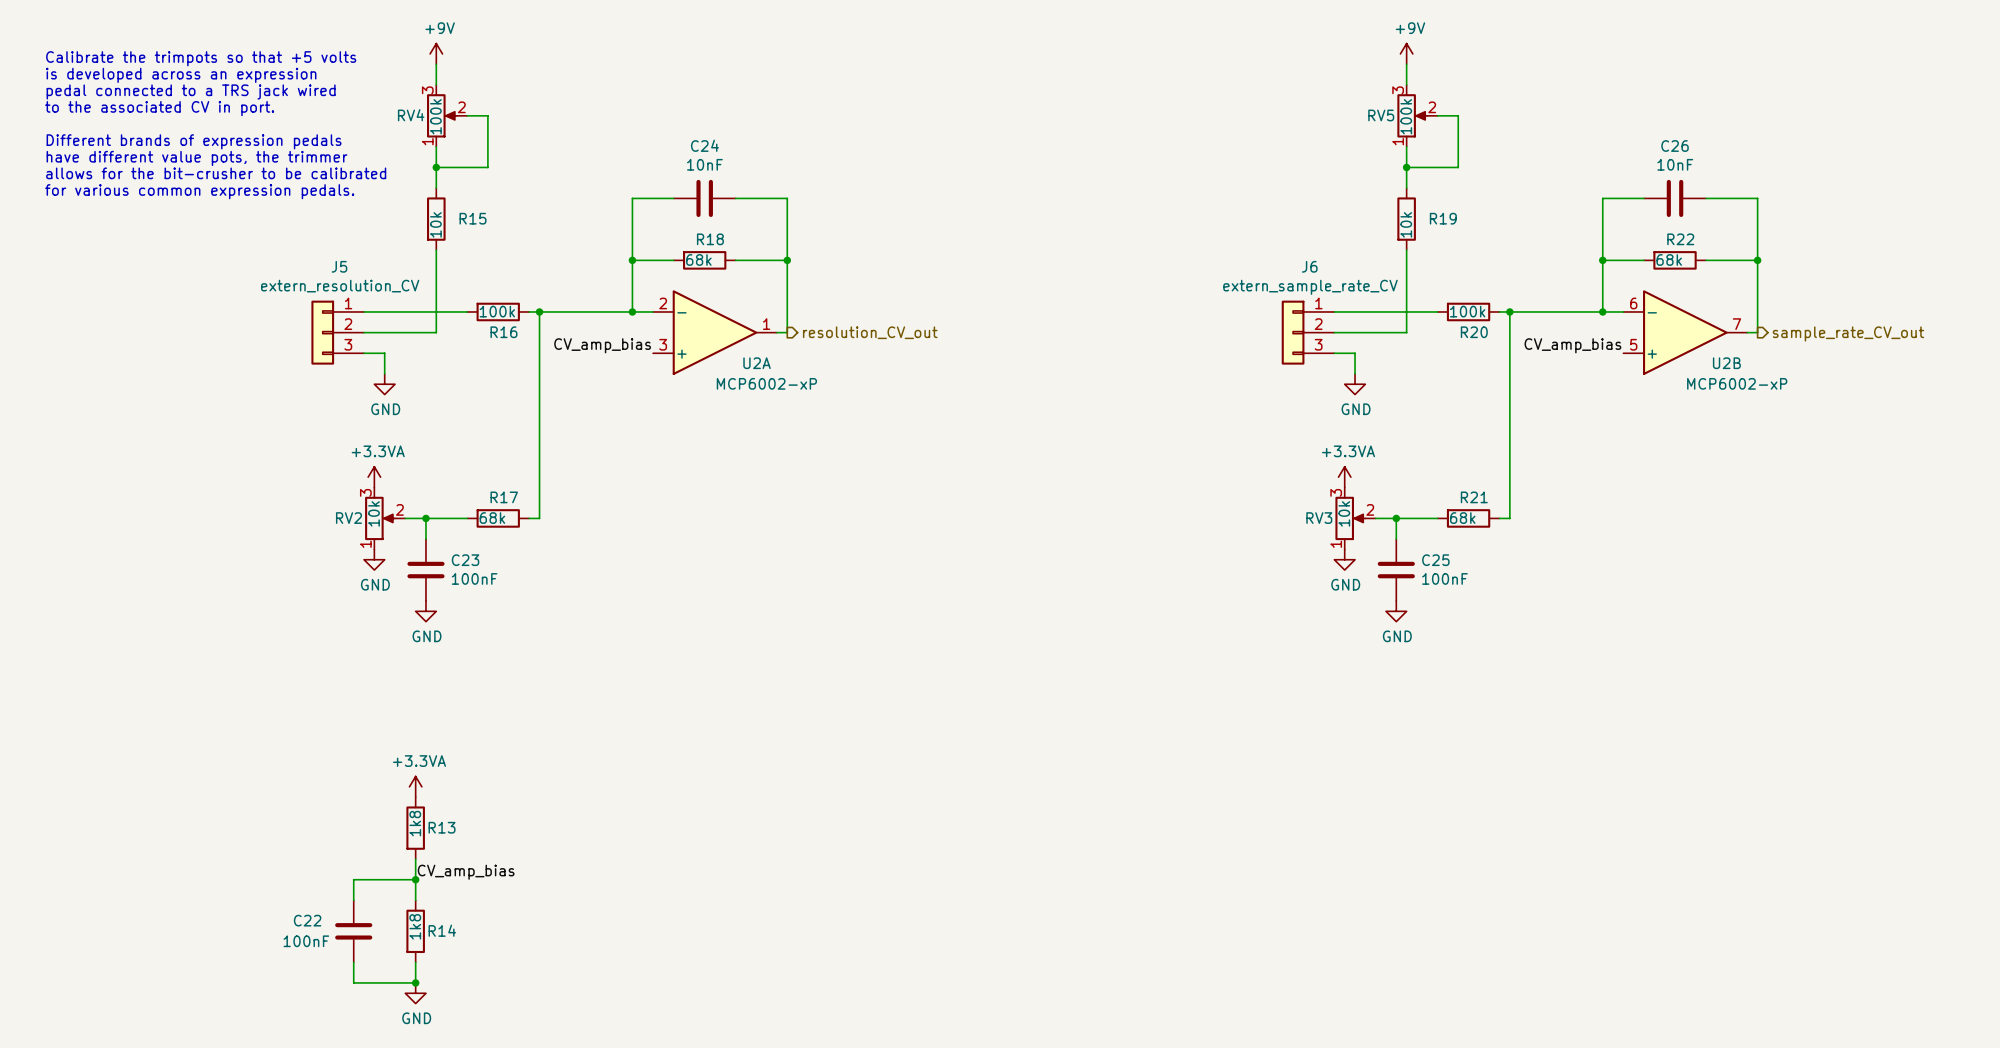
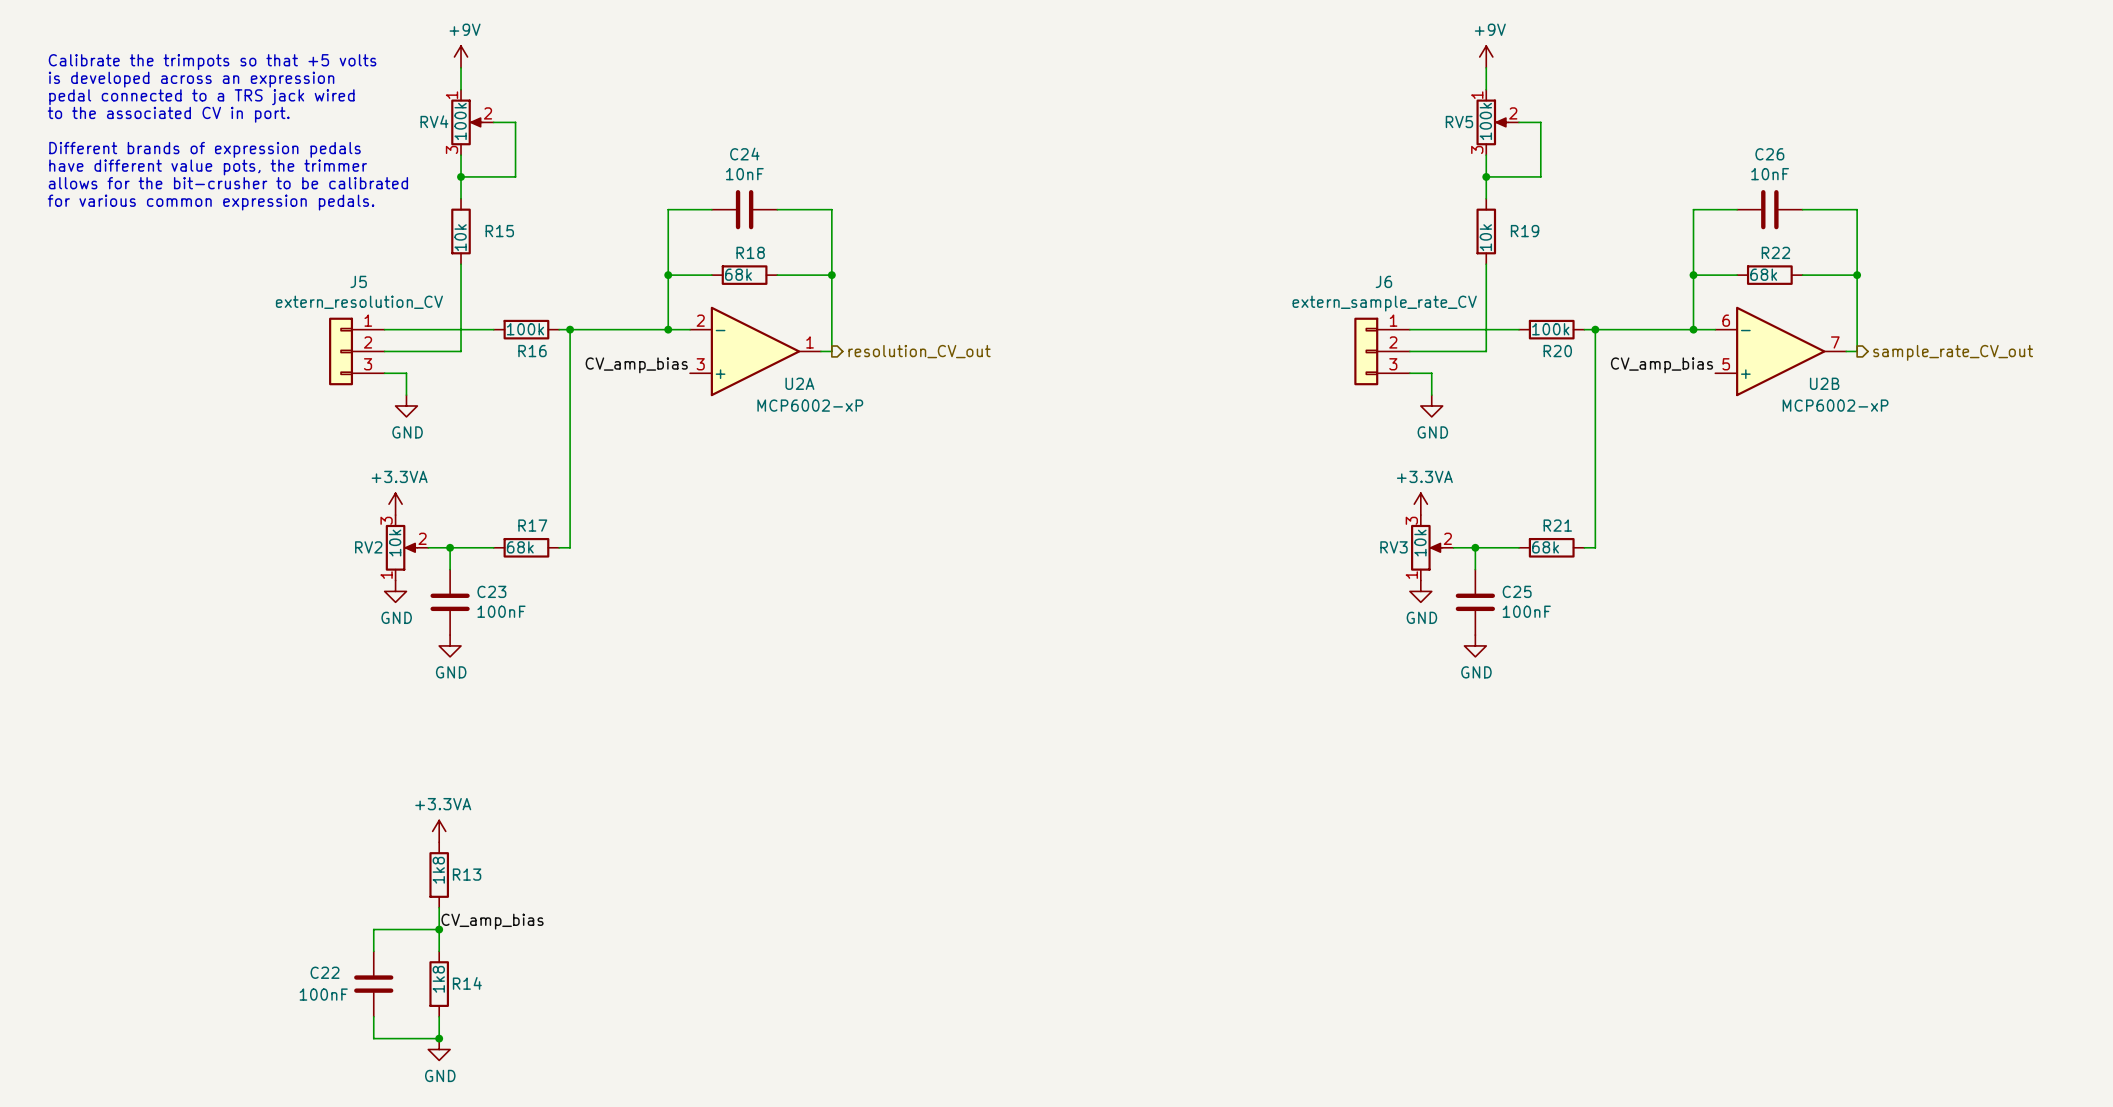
RV4 flip: as is (441, 115) -> up-down (467, 122)
RV5 flip: as is (1412, 115) -> up-down (1492, 122)

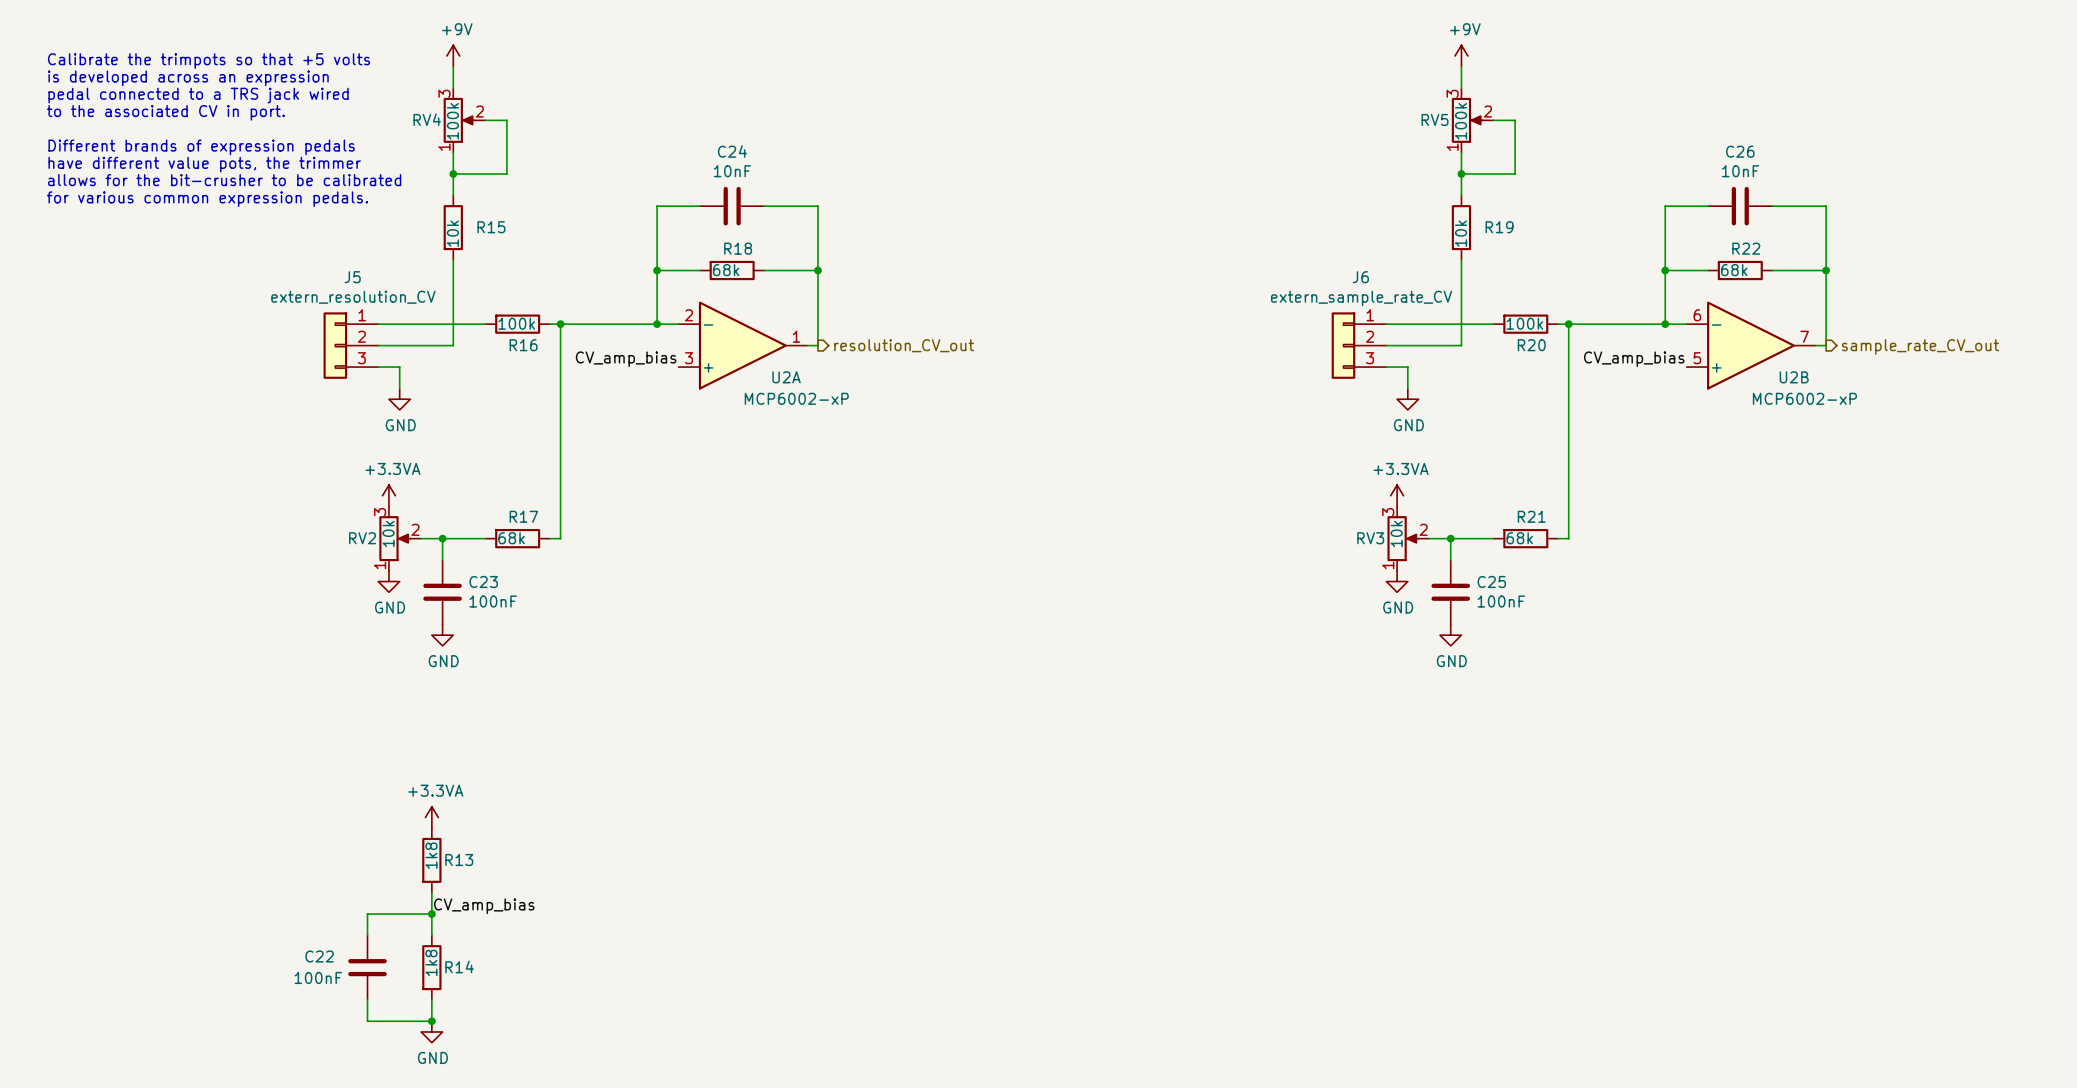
RV4 flip: as is (467, 122) -> up-down (459, 120)
RV5 flip: as is (1492, 122) -> up-down (1467, 120)

